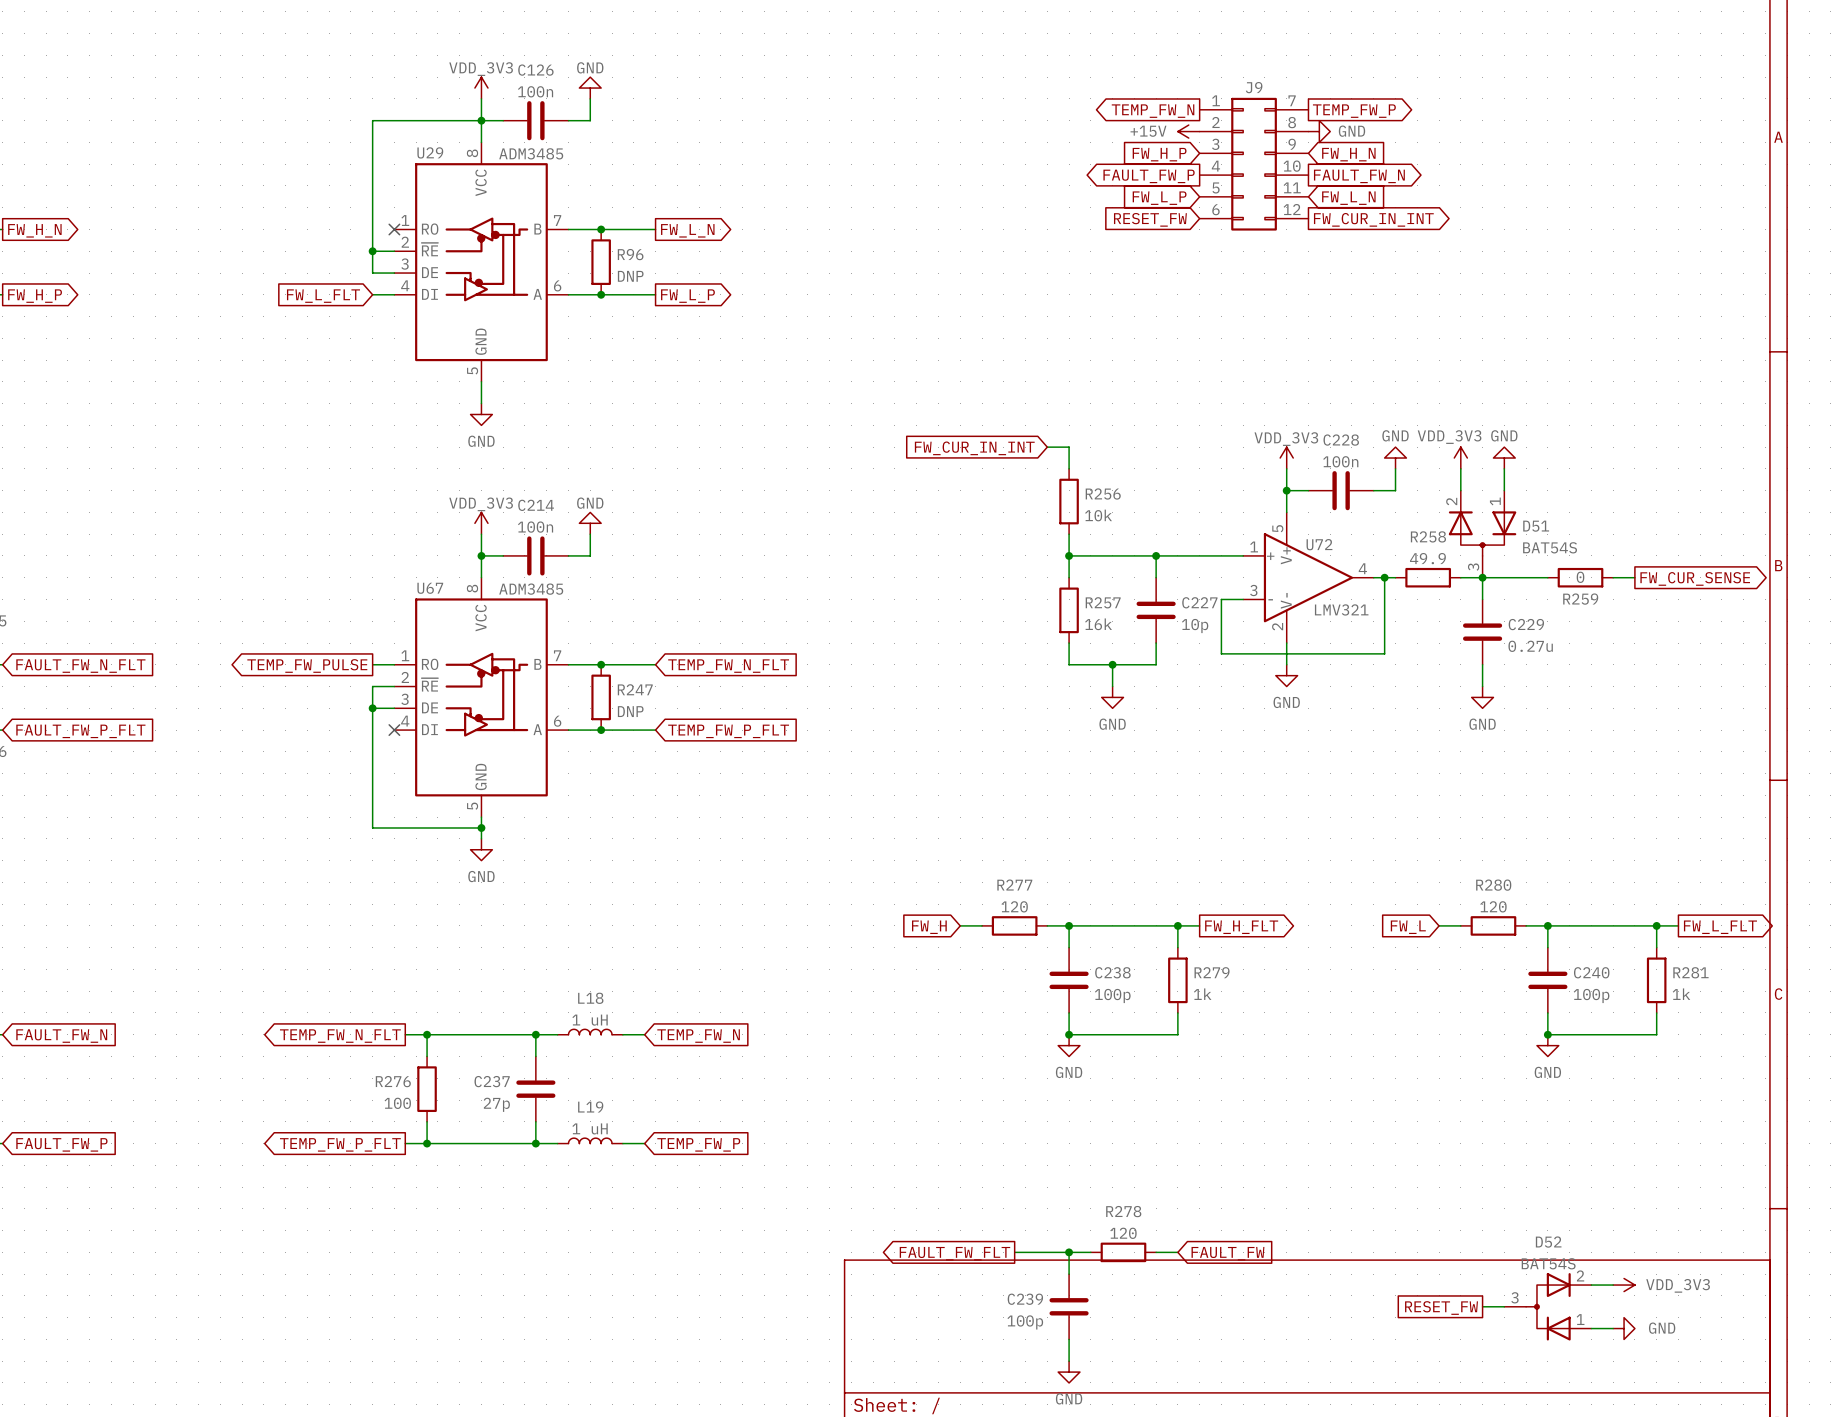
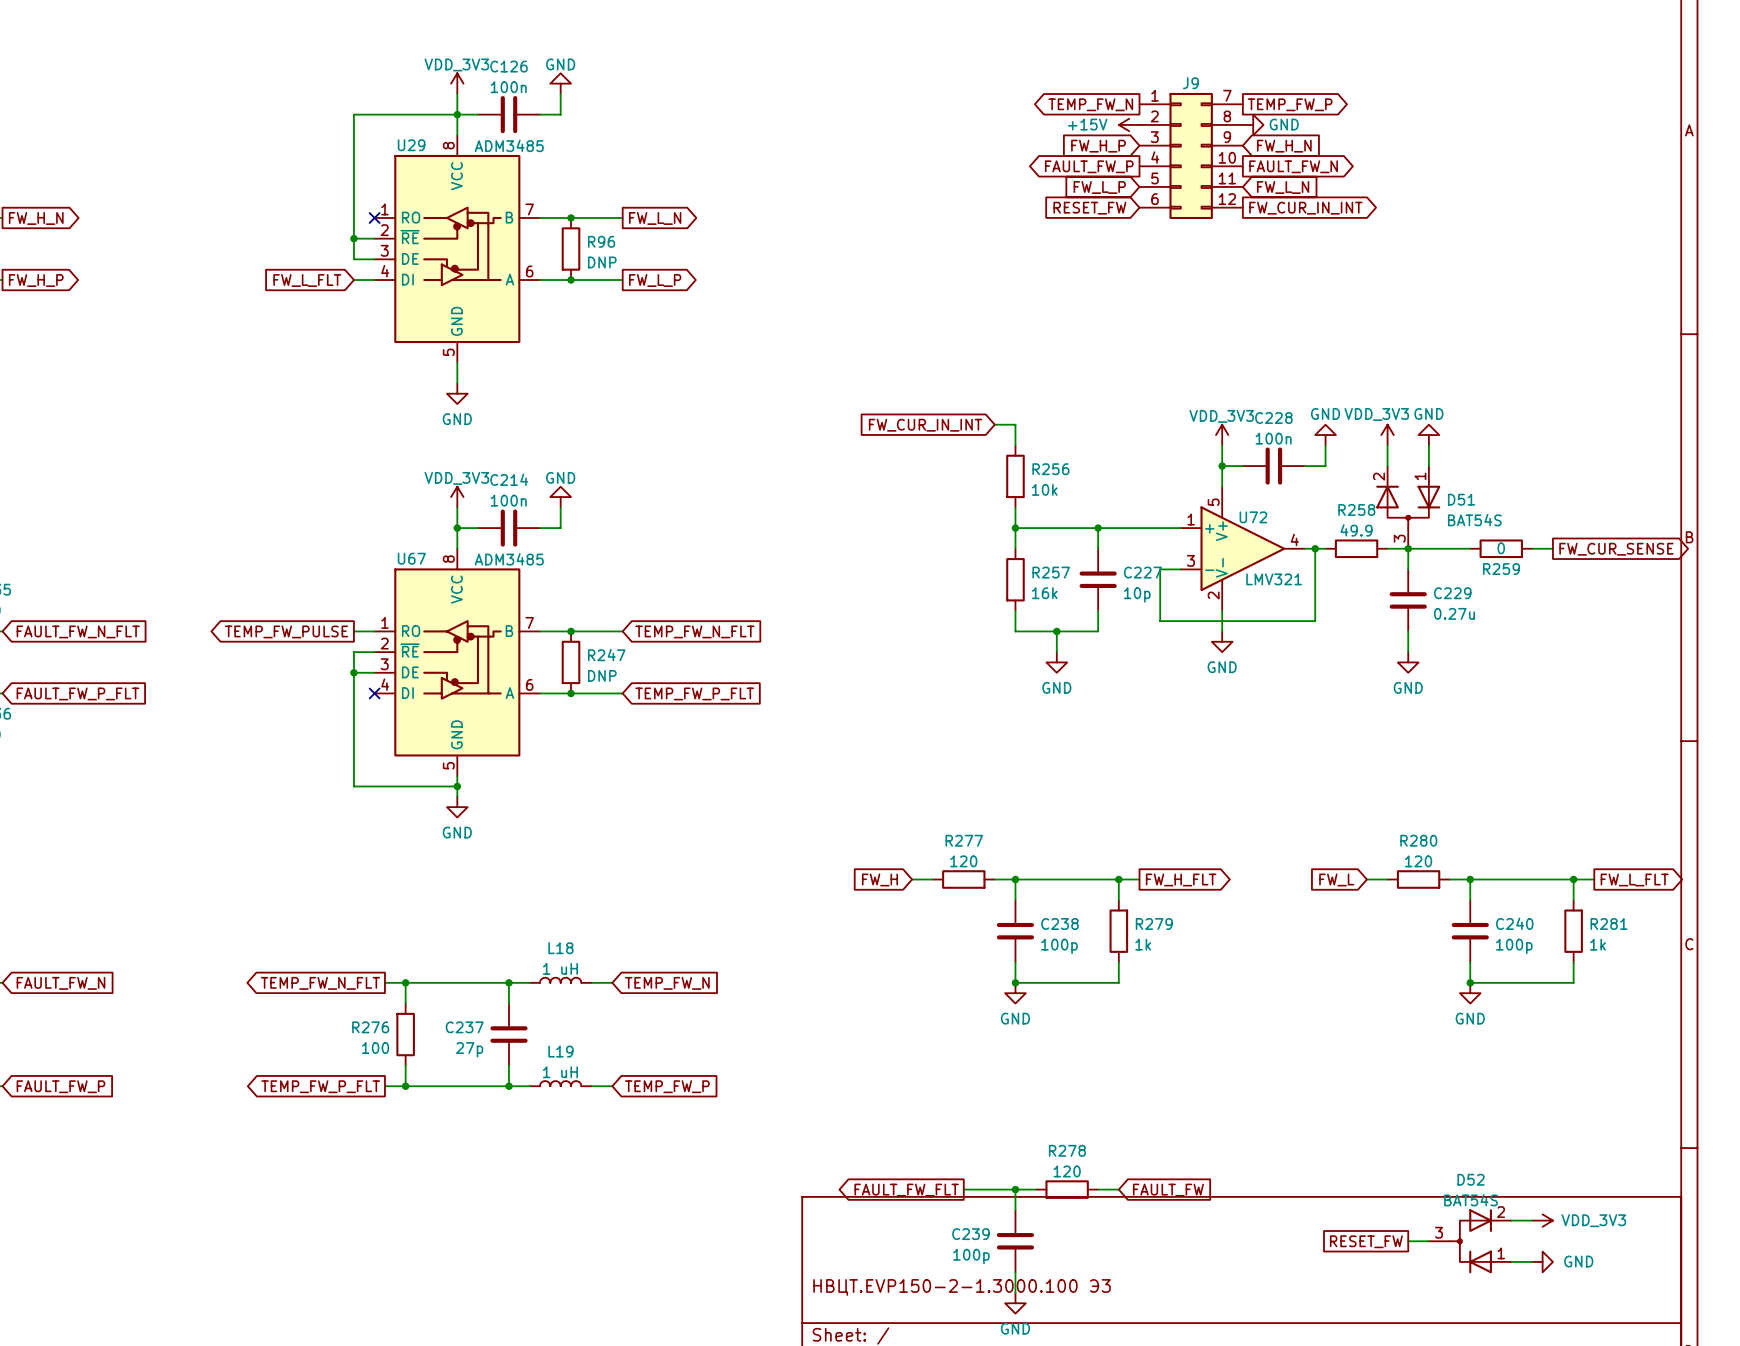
title block: none -> НВЦТ.EVP150-2-1.3000.100 Э3 (962, 1287)

